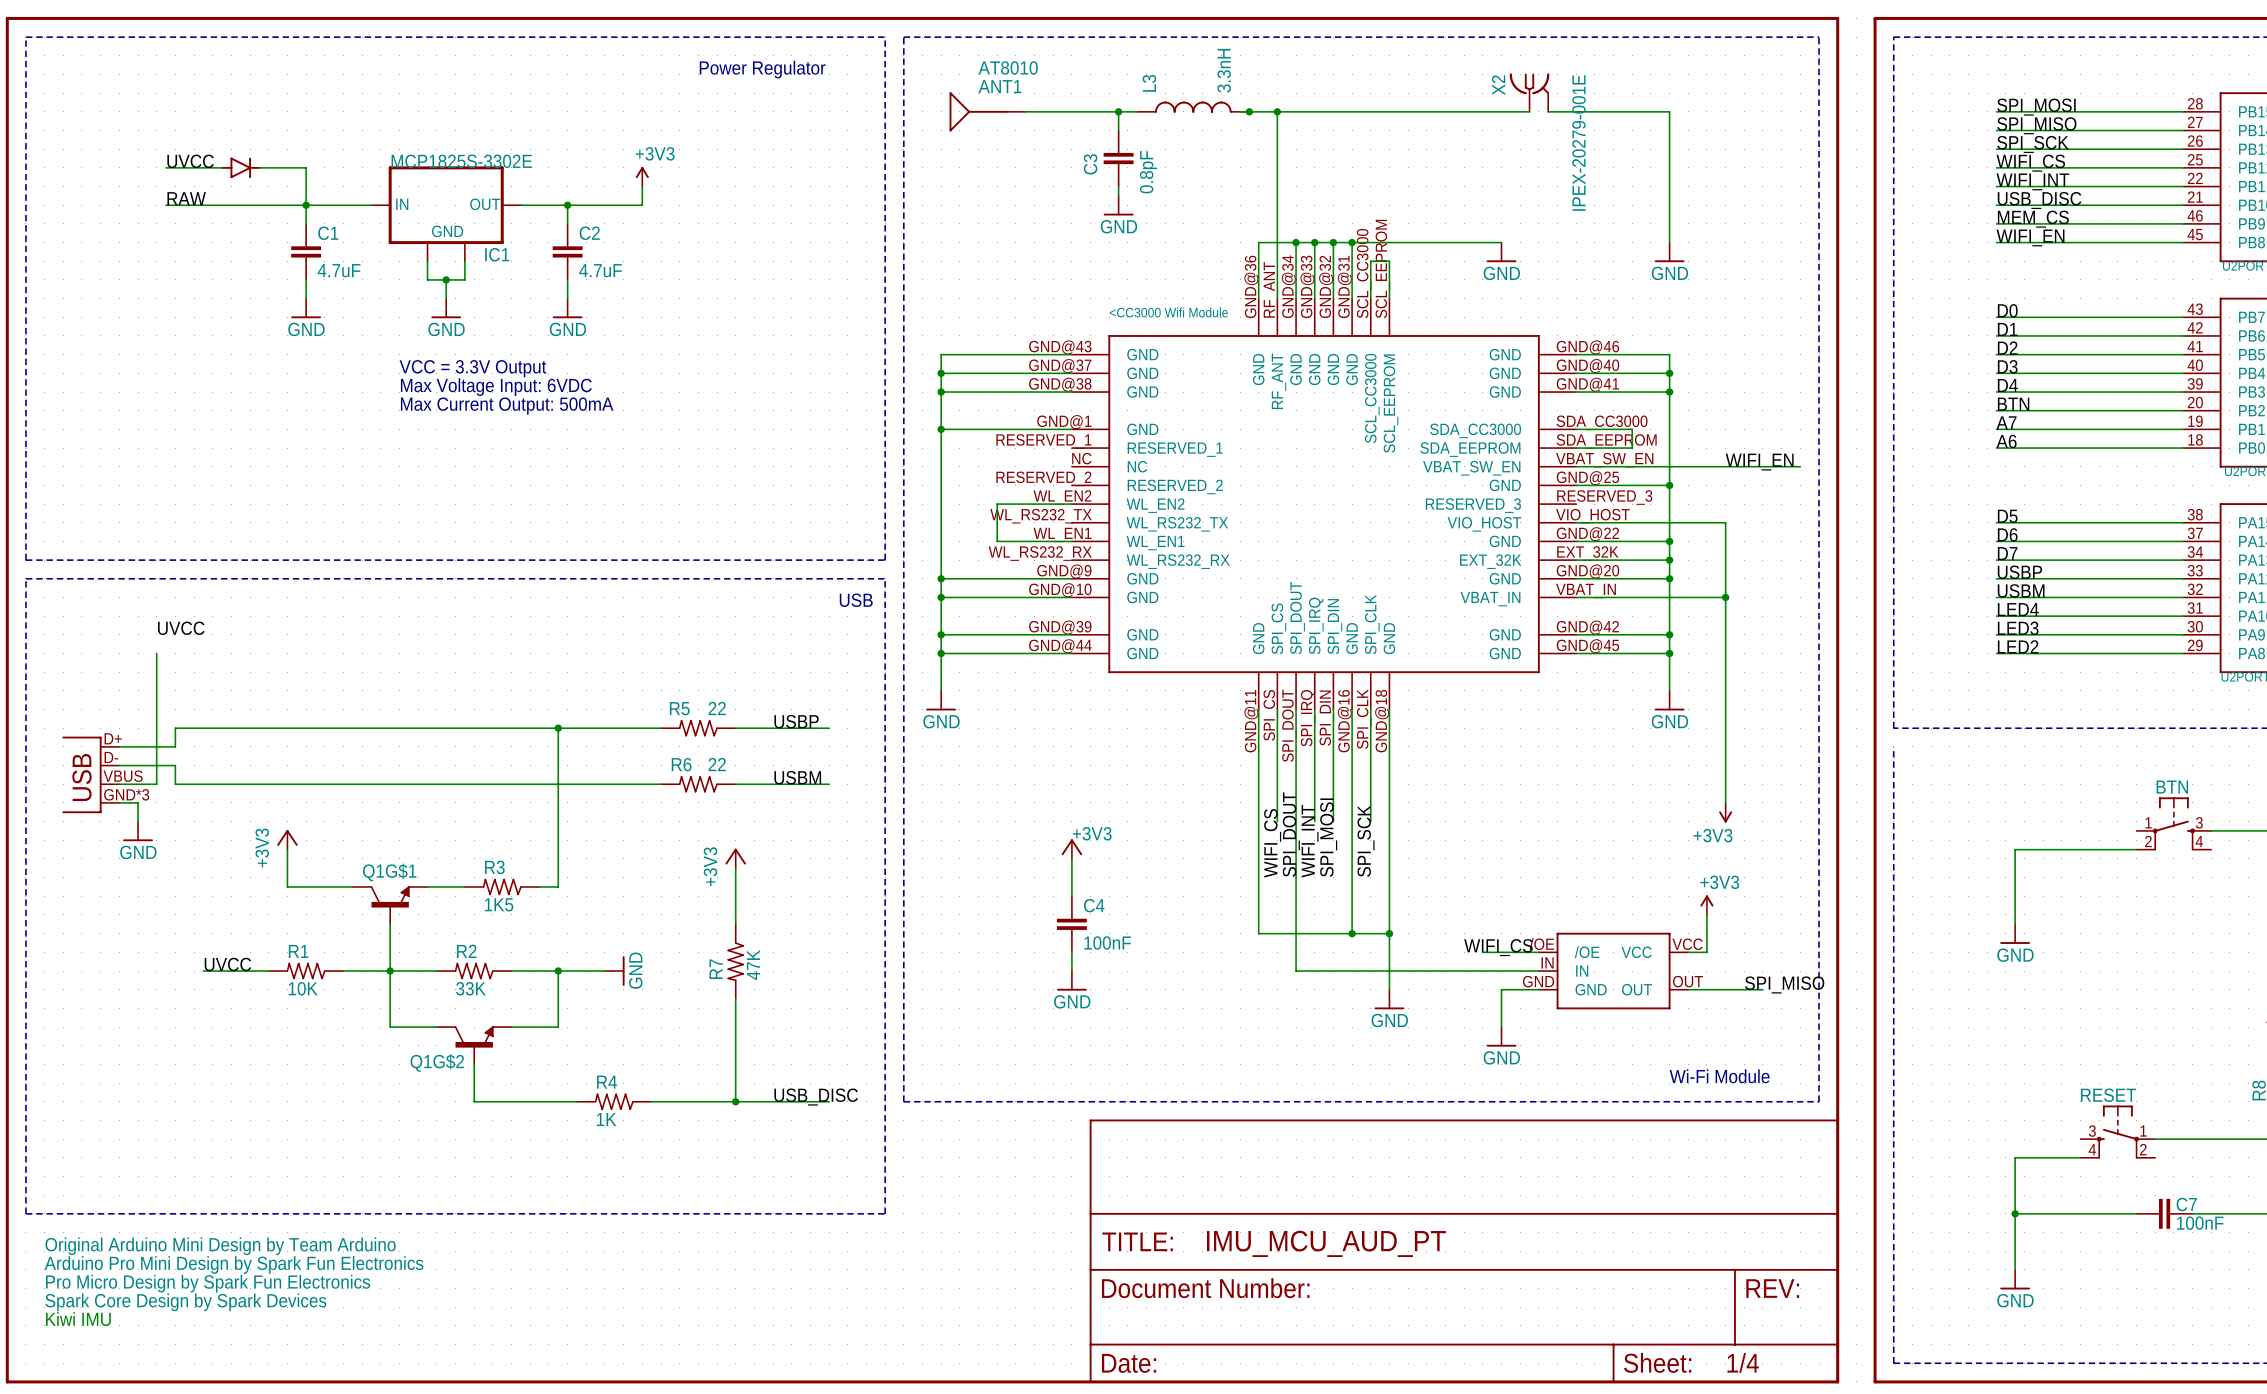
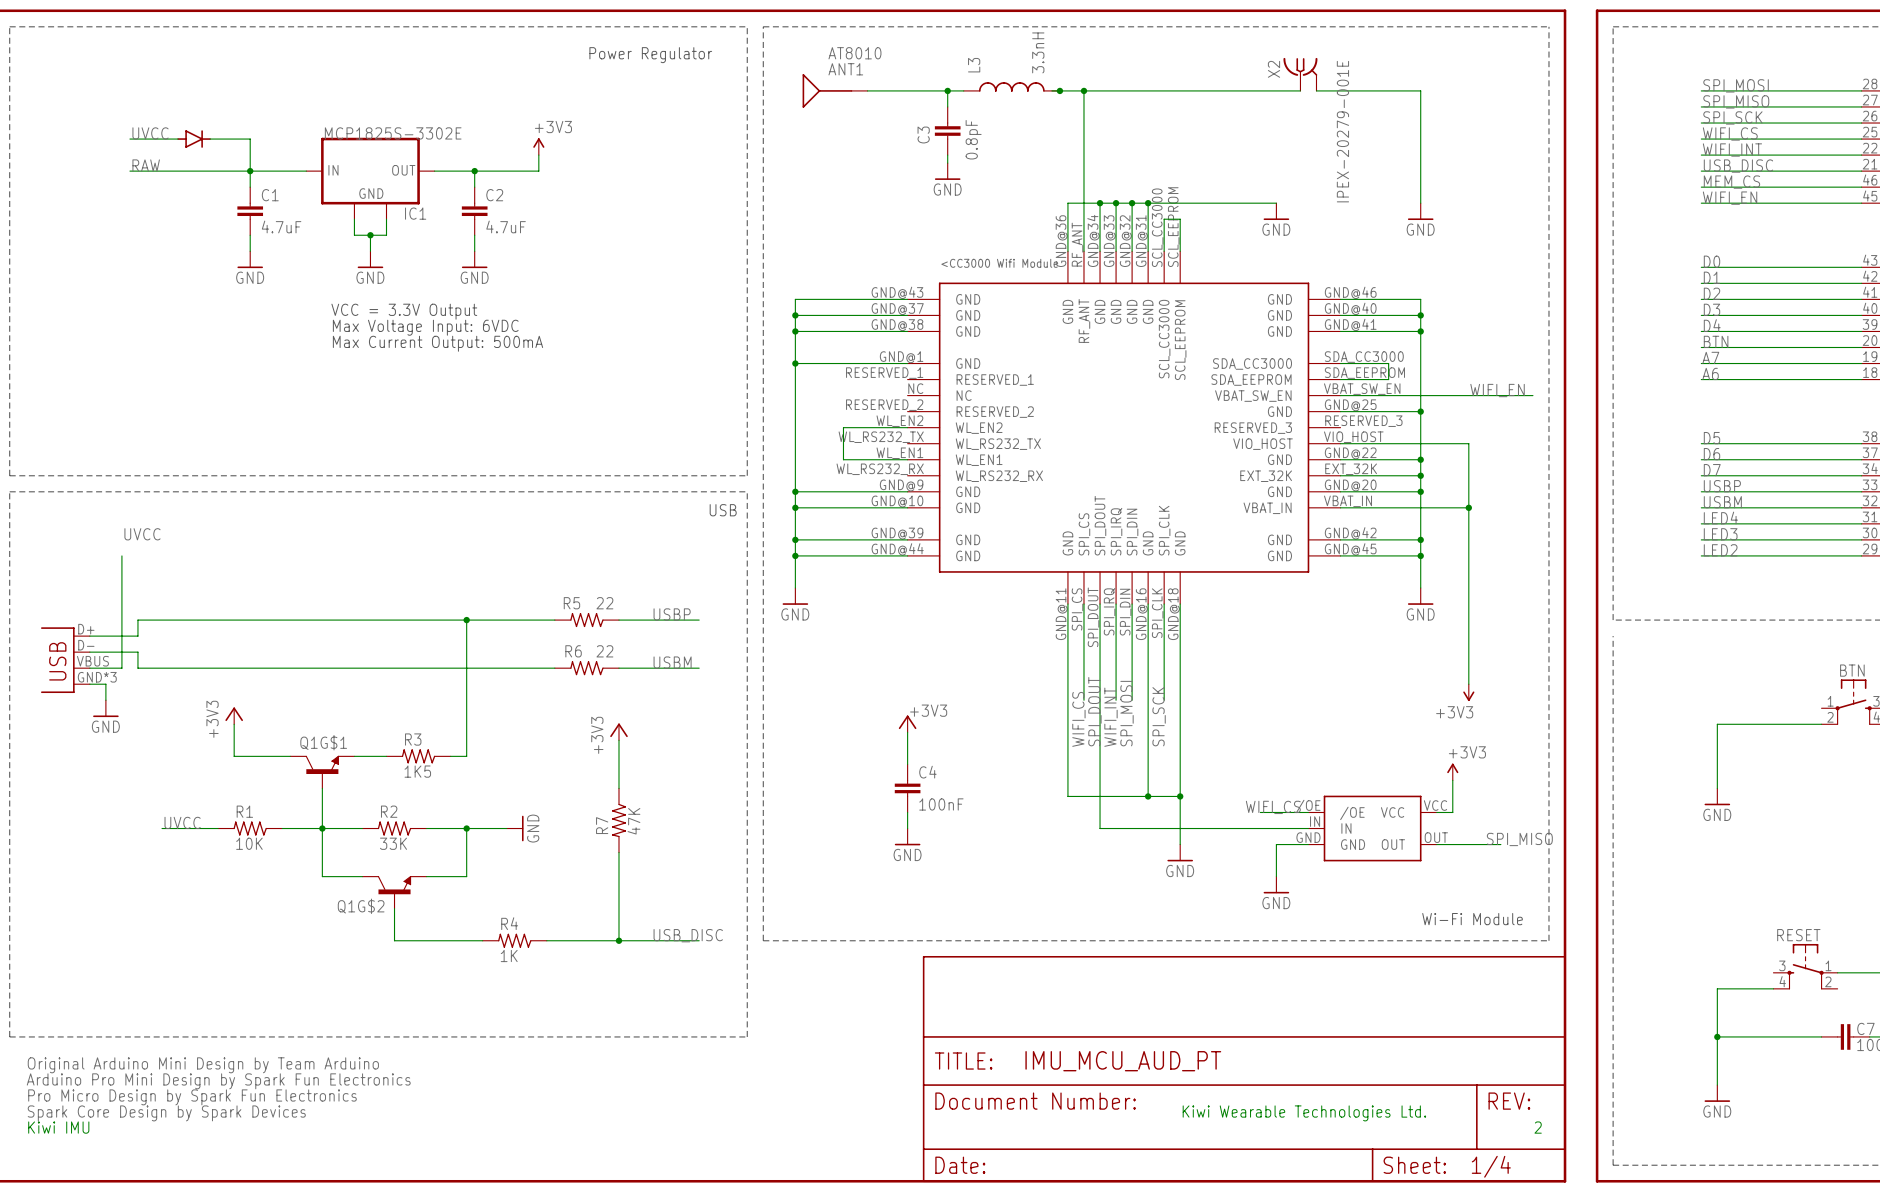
text: none -> Kiwi Wearable Technologies Ltd. (1304, 1113)
text: none -> 2 (1538, 1127)

